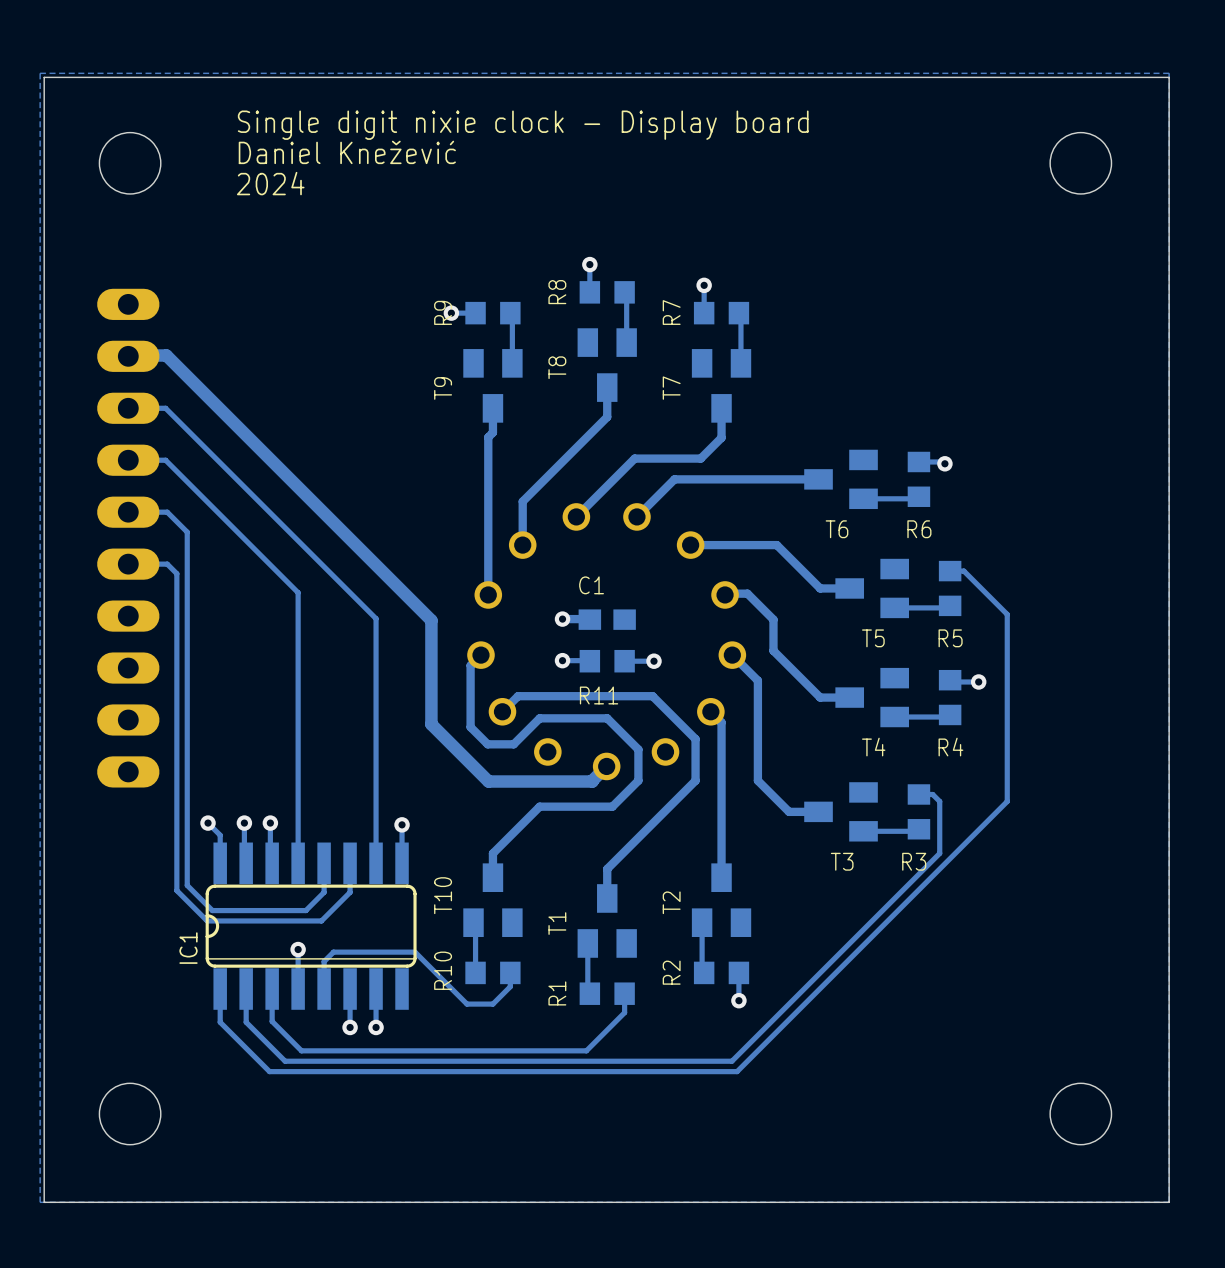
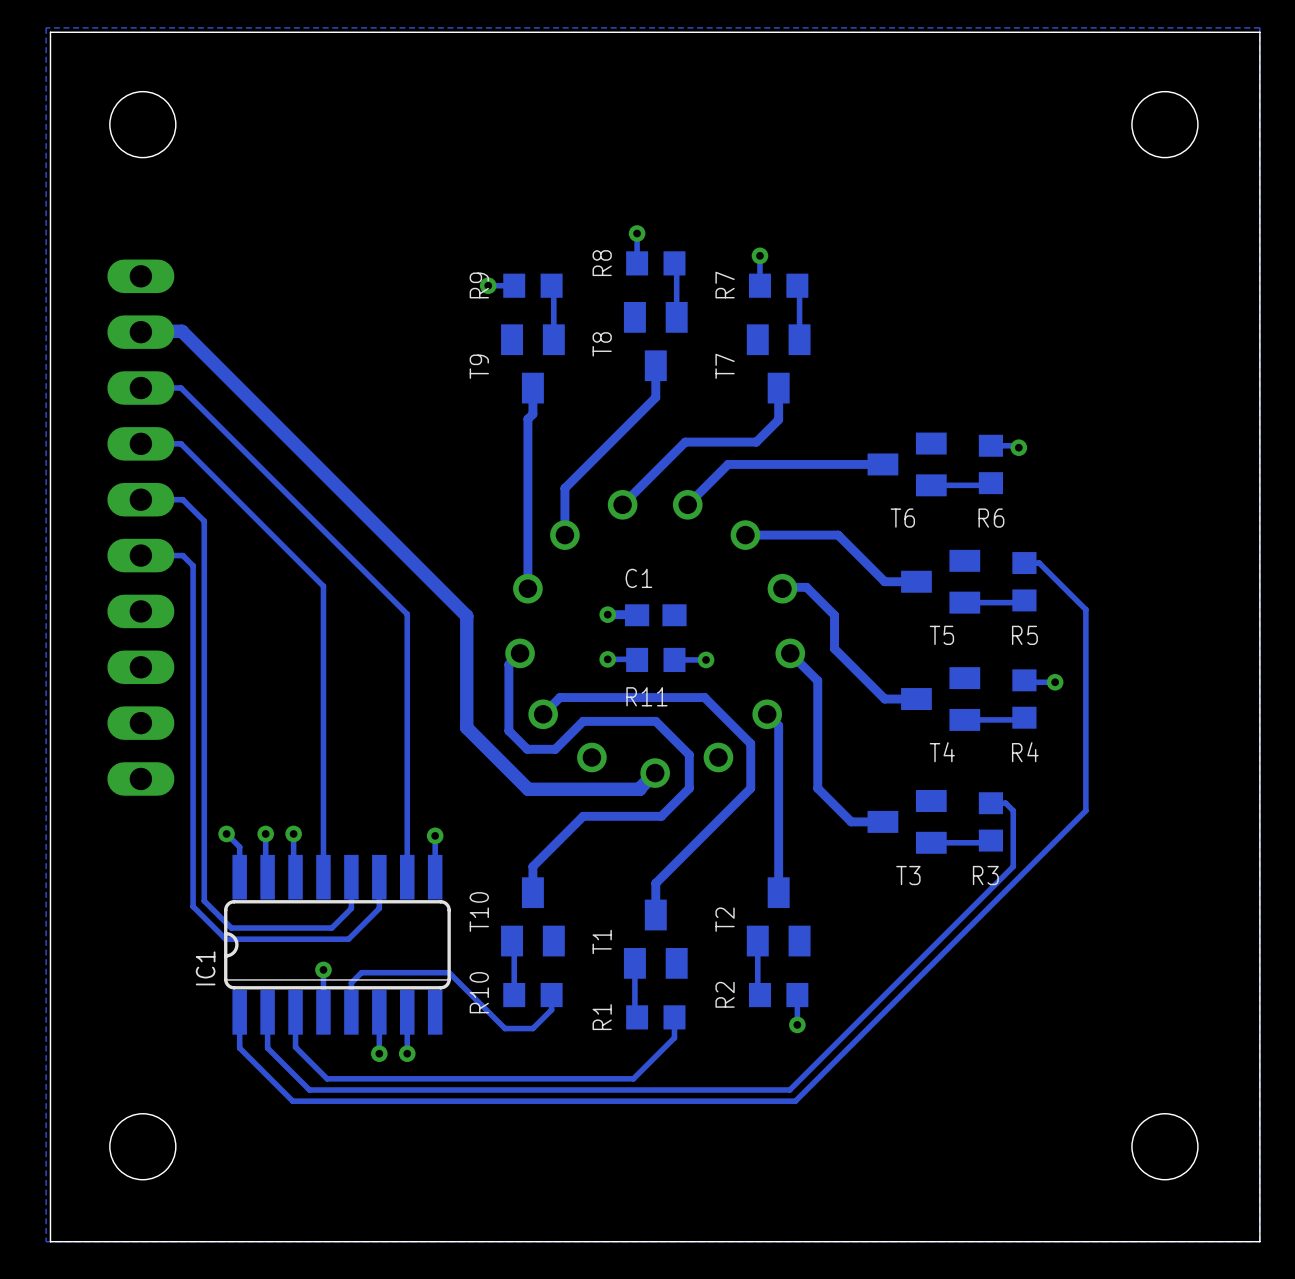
text: Single digit nixie clock - Display board (523, 125) -> none
text: Daniel Knežević (347, 152) -> none
text: 2024 (270, 183) -> none

